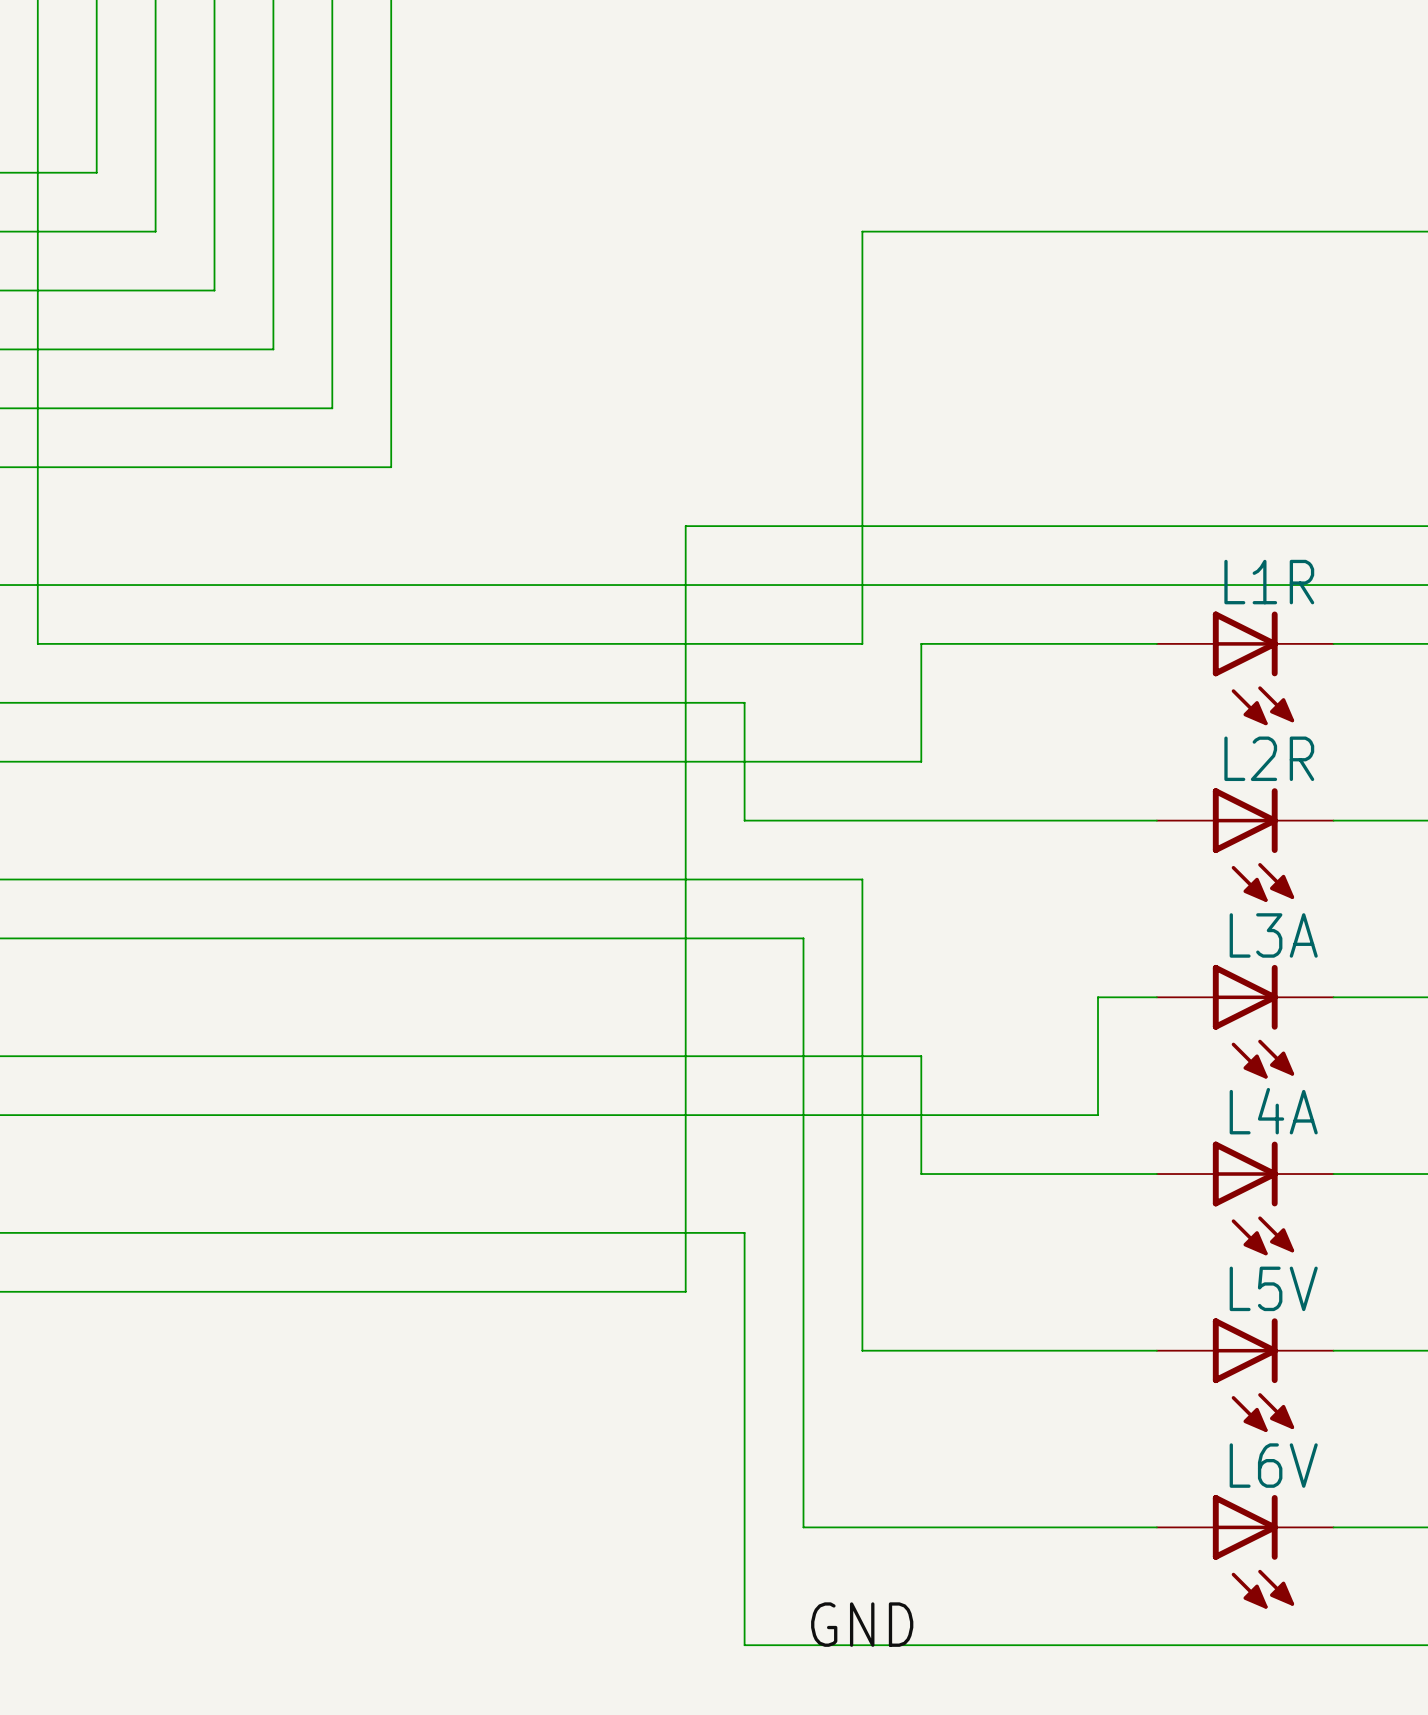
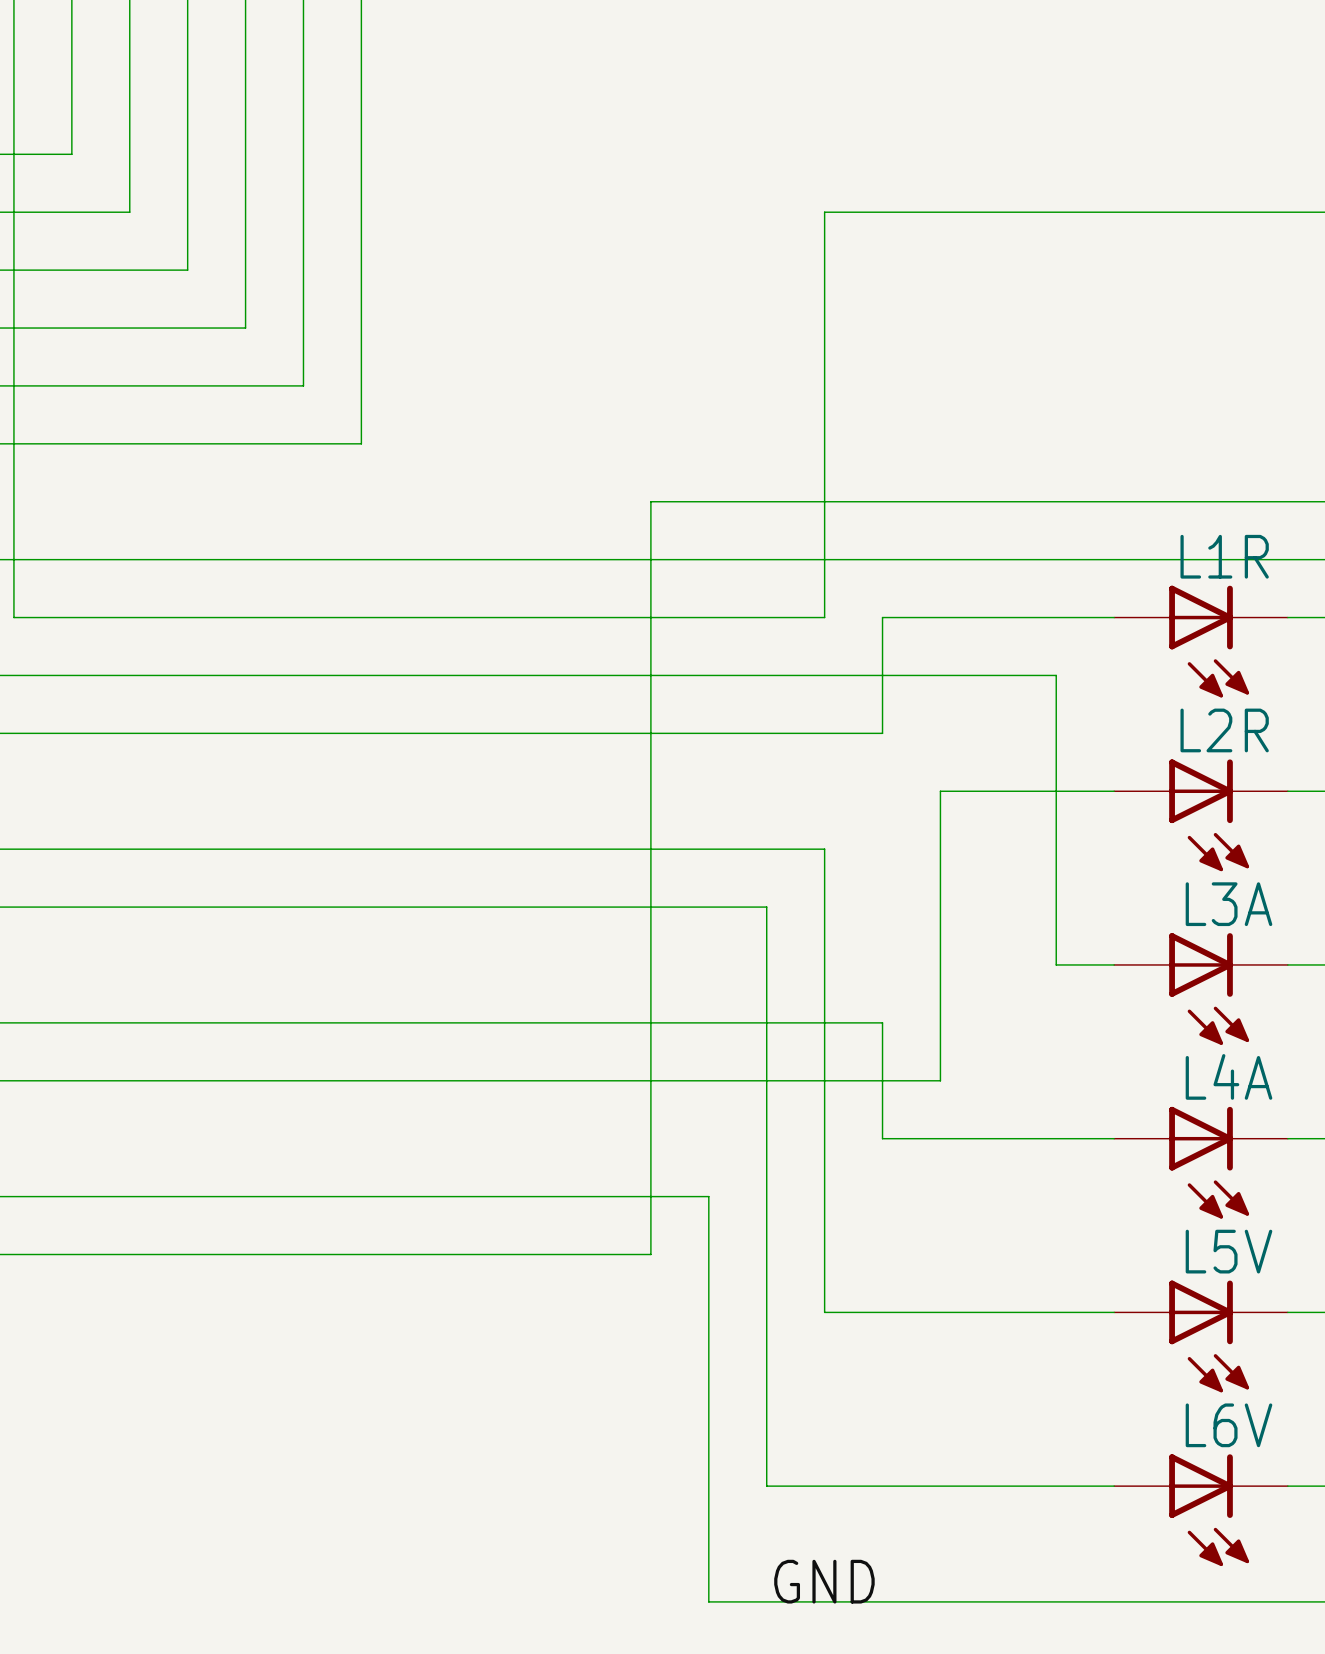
wire: (744, 702) (744, 820) (980, 820) -> (708, 675) (1056, 675) (1056, 964)
wire: (1097, 997) (1097, 1115) (980, 1115) -> (940, 791) (940, 1080)

